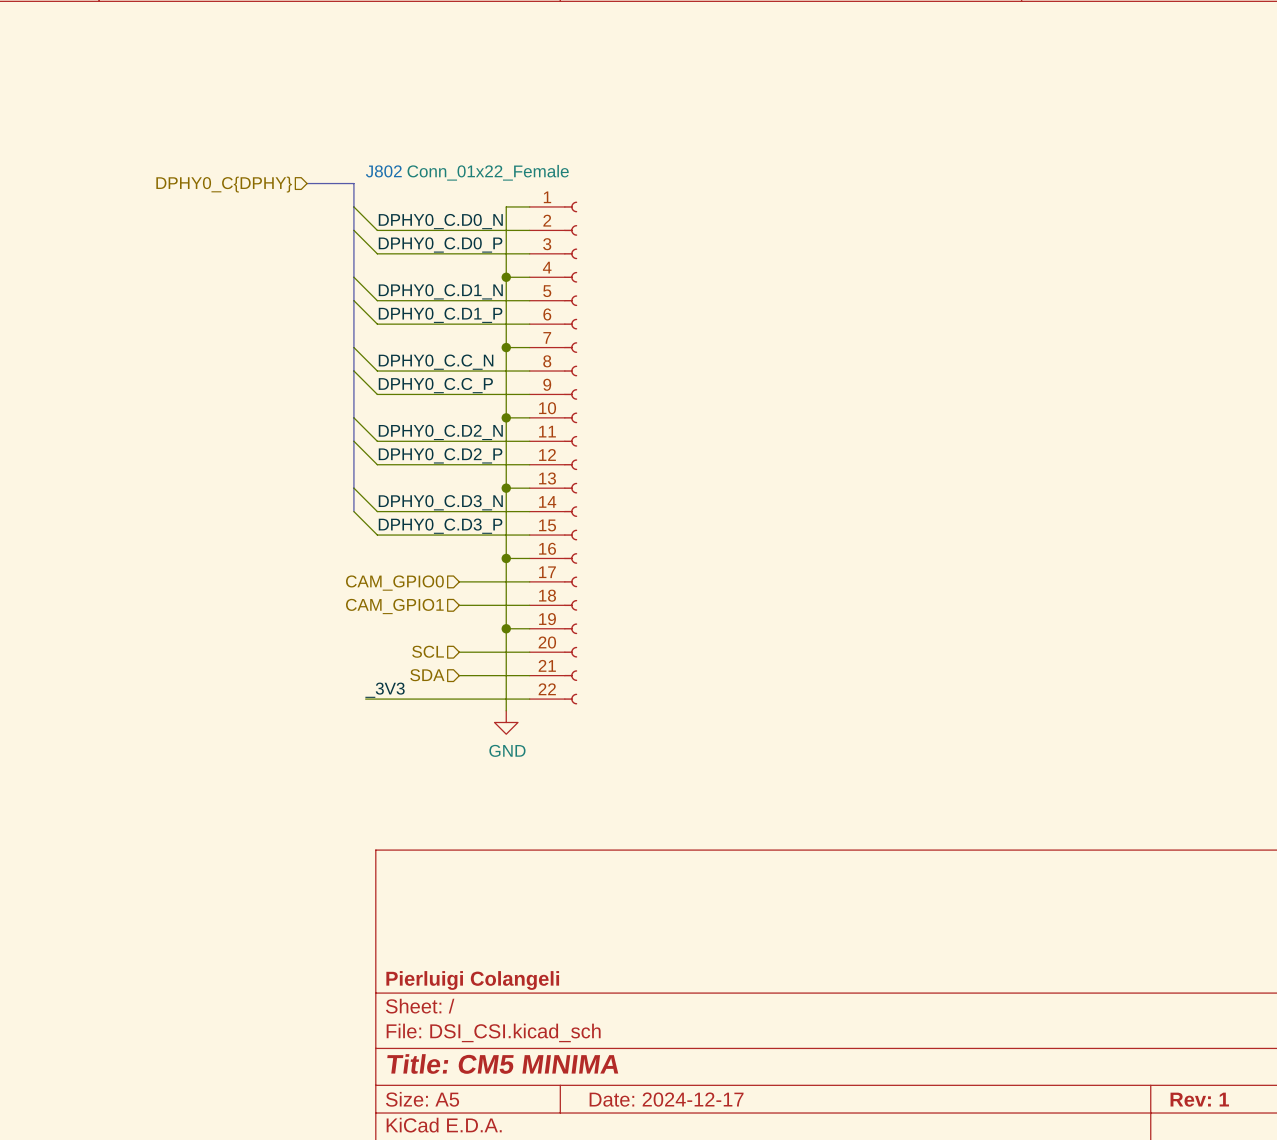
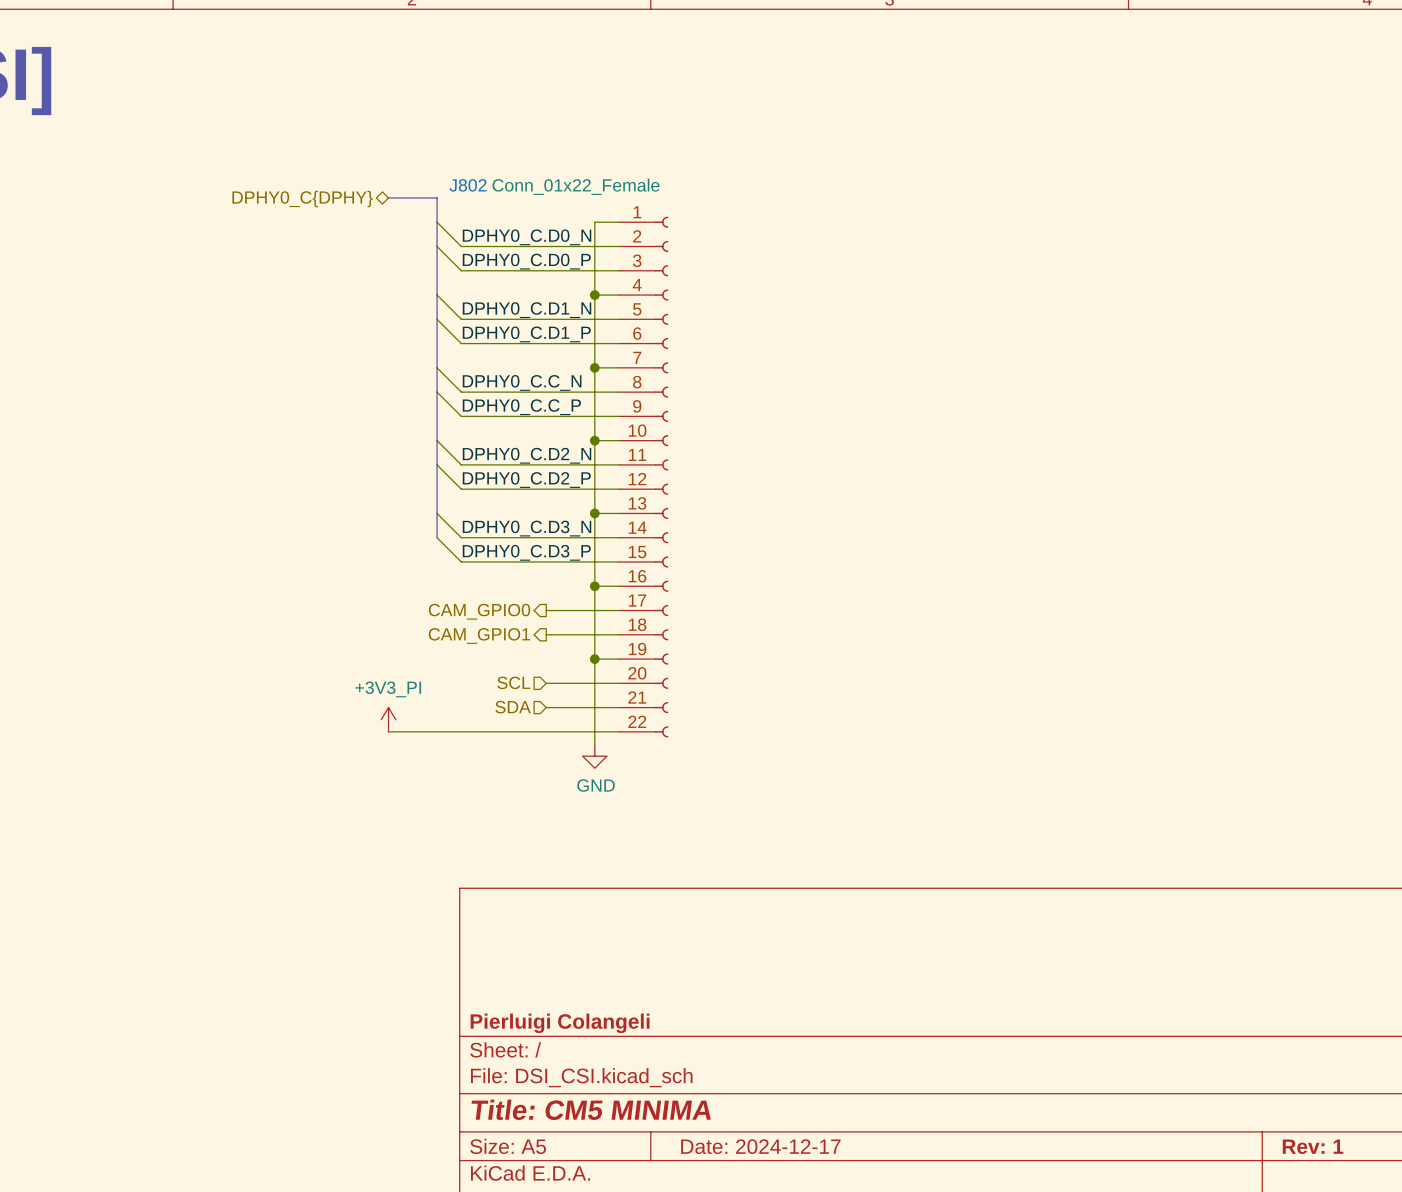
hierarchical label shape: input (224, 184) -> bidirectional (302, 199)
hierarchical label shape: input (394, 583) -> output (479, 611)
hierarchical label shape: input (394, 606) -> output (479, 636)
power symbol: none -> +3V3_PI (388, 719)
label: _3V3 (385, 690) -> none
wire: none -> (388, 731) (449, 731)

